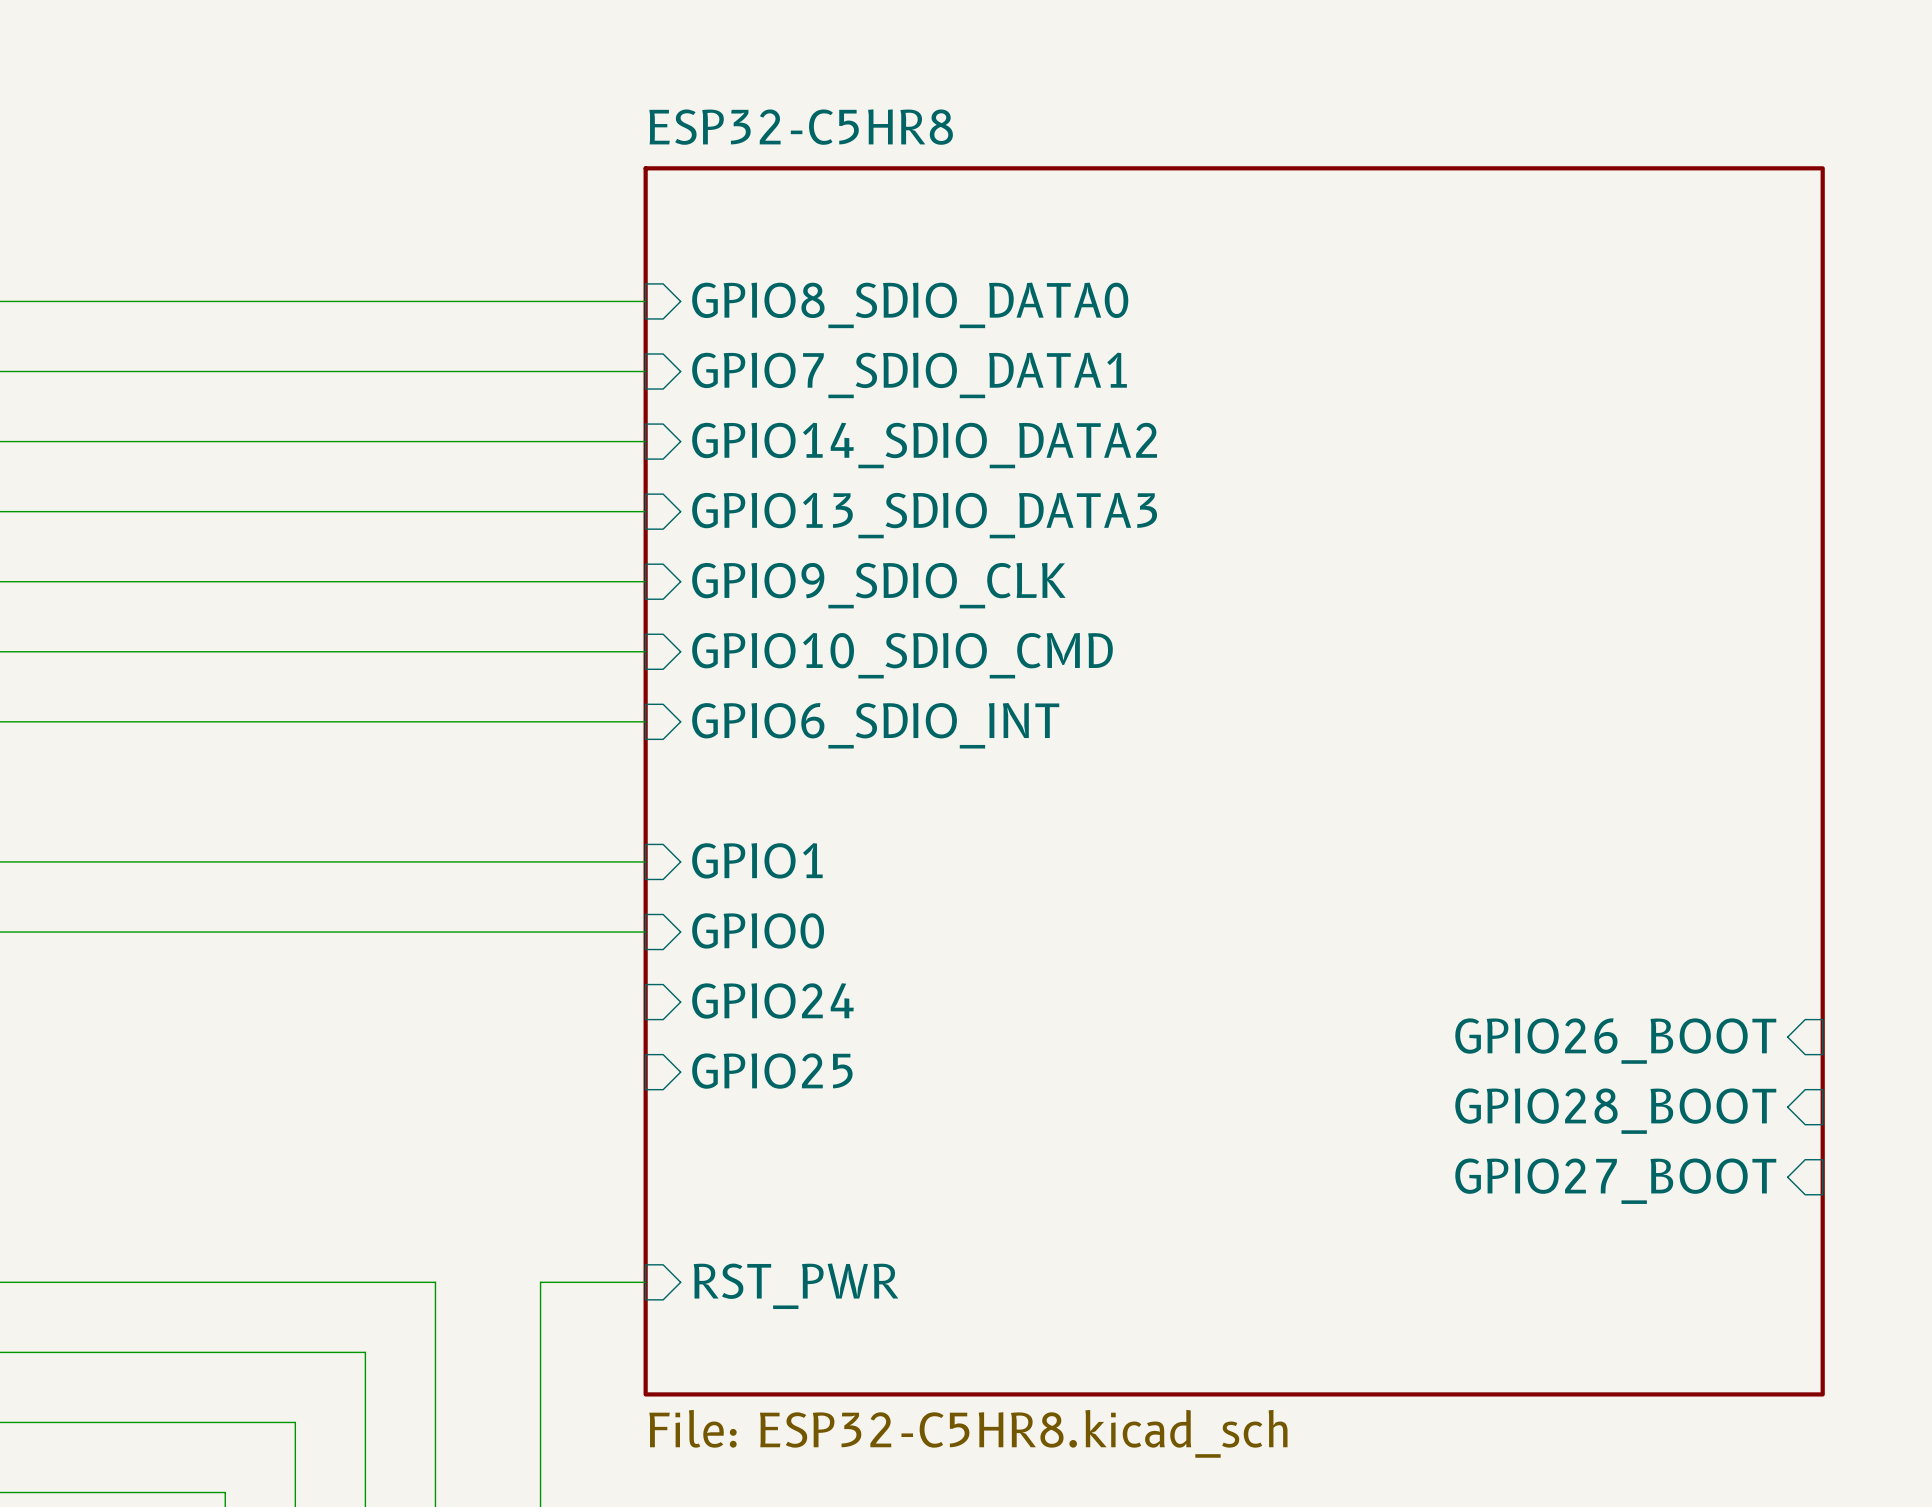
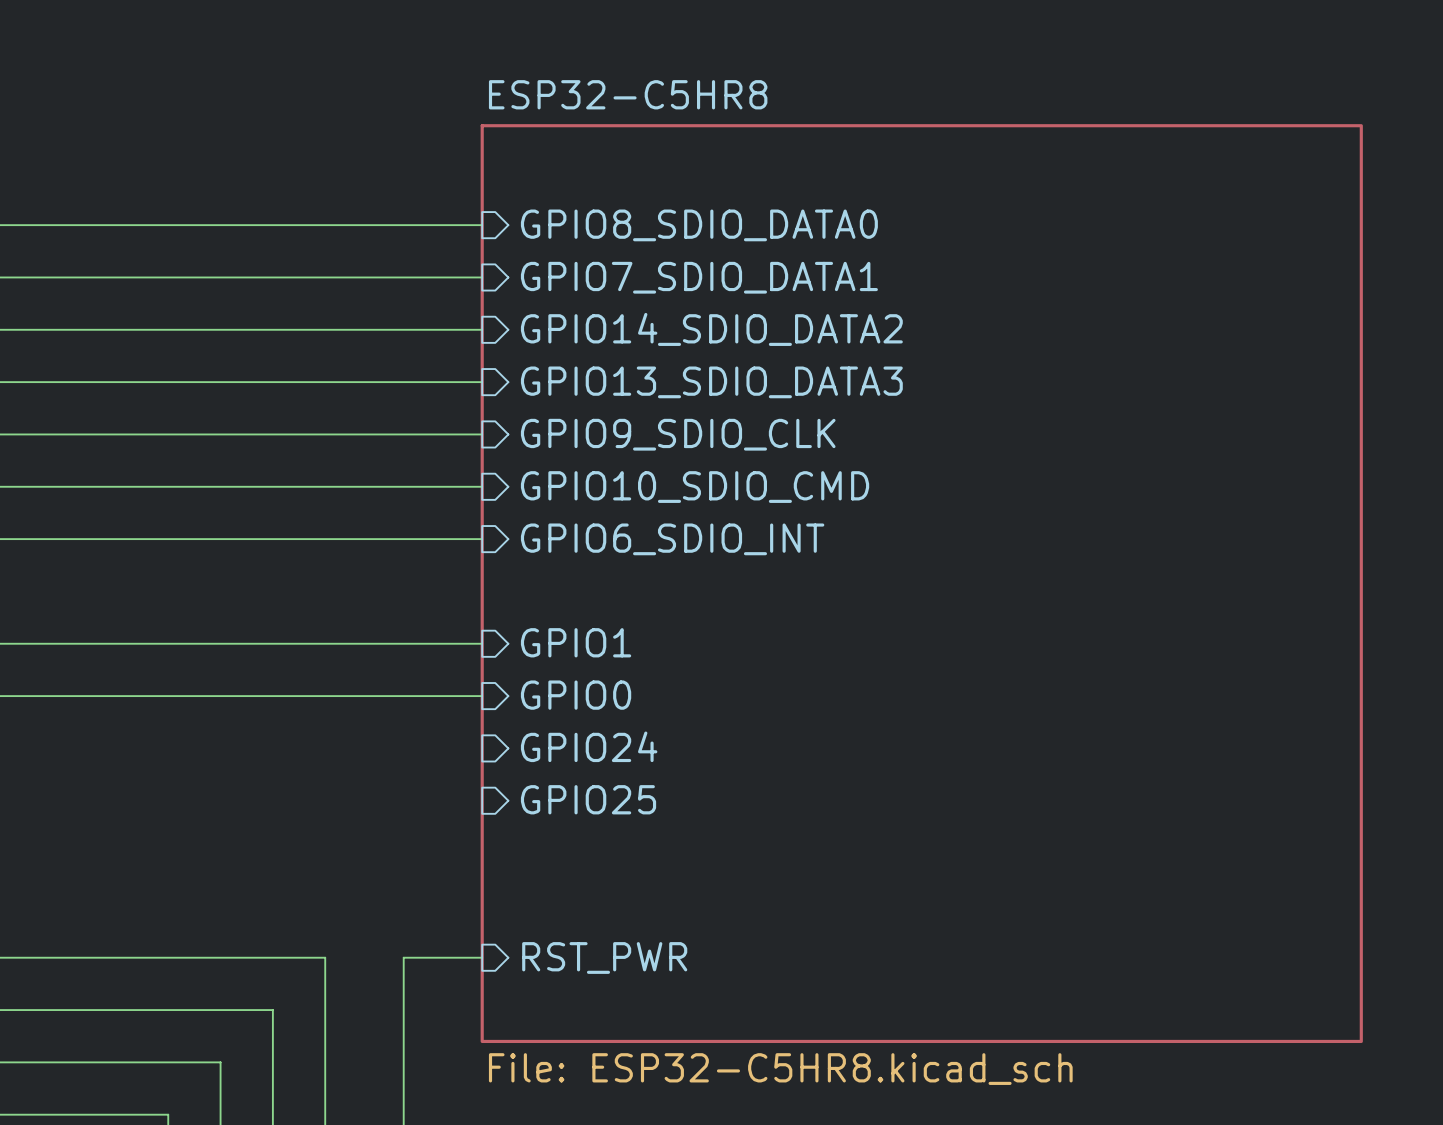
sheet pin: GPIO26_BOOT (1615, 1041) -> none
sheet pin: GPIO28_BOOT (1615, 1111) -> none
sheet pin: GPIO27_BOOT (1615, 1181) -> none

